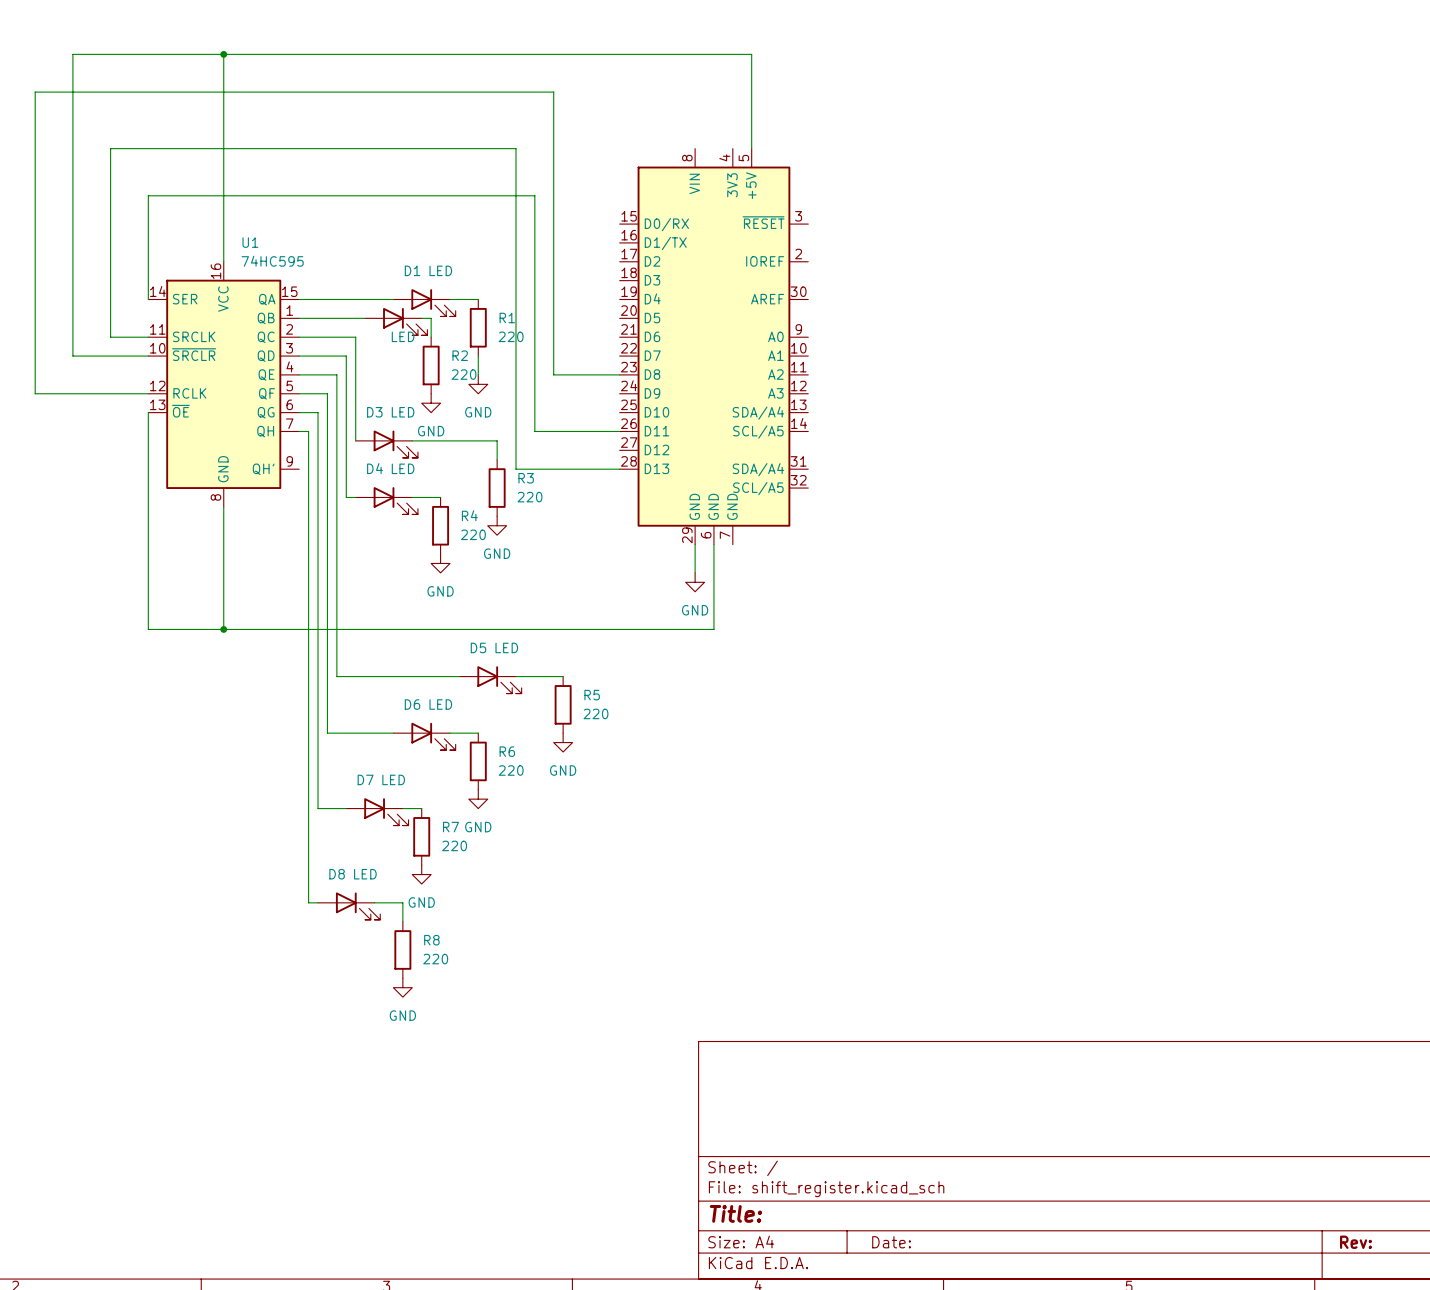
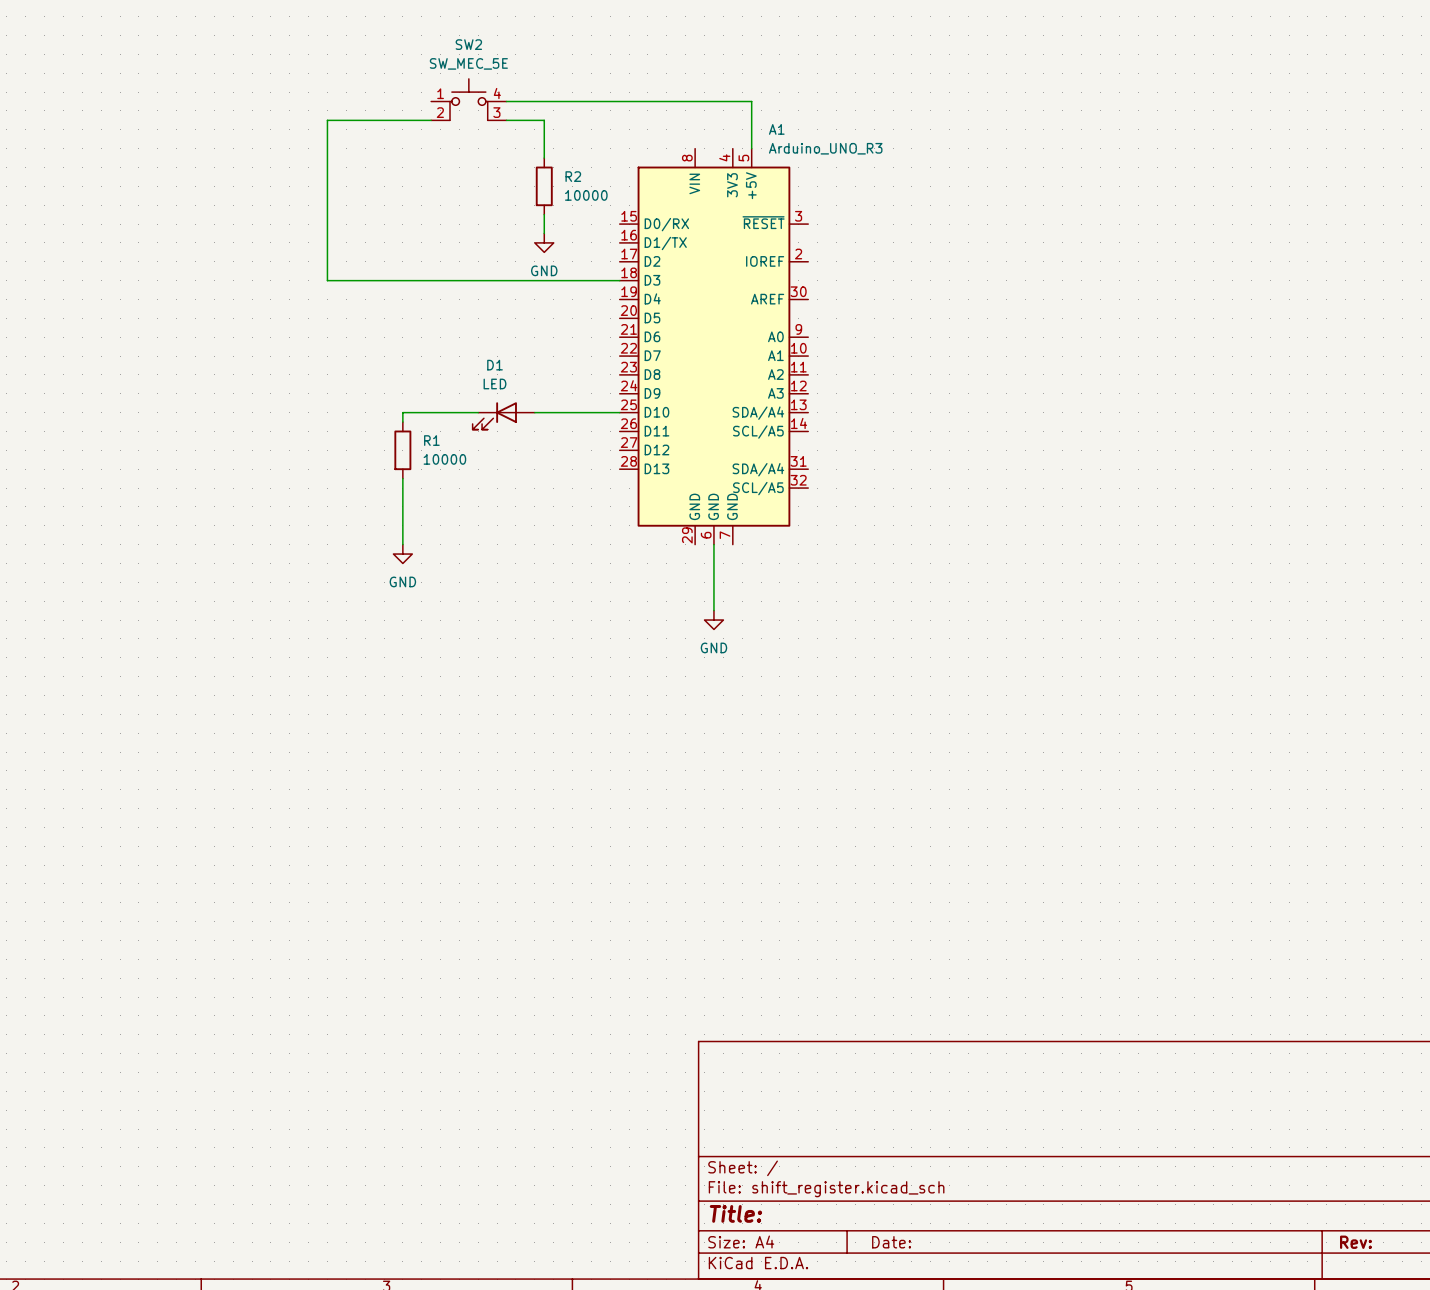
wire: (223, 54) (223, 261) -> none
junction: (223, 54) -> none
SW2: none -> SW_MEC_5E (468, 99)
wire: (751, 101) (751, 54) (72, 54) (72, 356) (148, 356) -> (751, 101) (506, 101)
wire: none -> (431, 120) (327, 120) (327, 280) (619, 280)
wire: none -> (506, 120) (544, 120) (544, 158)
A1 name: none -> A1 (776, 129)
A1 value: none -> Arduino_UNO_R3 (825, 148)
power symbol: none -> GND (544, 242)
D1 name position: D1 (412, 270) -> D1 (495, 365)
wire: (148, 299) (148, 195) (534, 195) (534, 431) (619, 431) -> none
wire: (299, 299) (393, 299) -> none
wire: (450, 299) (478, 299) -> none
D1 position: (424, 302) -> (503, 415)
D1 flip: as is (433, 302) -> left-right (494, 415)
wire: (299, 318) (365, 318) -> none
wire: (421, 318) (431, 318) (431, 337) -> none
part: LED (396, 321) -> none
R1 position: (478, 327) -> (402, 450)
R1 value: 220 (511, 336) -> 10000 (444, 459)
wire: (148, 337) (110, 337) (110, 148) (515, 148) (515, 469) (619, 469) -> none
wire: (299, 337) (355, 337) (355, 440) -> none
wire: (299, 356) (346, 356) (346, 497) (355, 497) -> none
wire: (478, 356) (478, 374) -> (544, 214) (544, 233)
R2 position: (431, 365) -> (544, 186)
wire: (299, 374) (336, 374) (336, 676) (459, 676) -> none
R2 value: 220 (463, 374) -> 10000 (586, 195)
wire: (619, 374) (553, 374) (553, 92) (35, 92) (35, 393) (148, 393) -> none
U1: 74HC595 (223, 384) -> none
power symbol: GND (478, 384) -> none
wire: (299, 393) (327, 393) (327, 733) (393, 733) -> none
power symbol: GND (431, 403) -> none
wire: (148, 412) (148, 629) (713, 629) (713, 610) -> none
wire: (299, 412) (318, 412) (318, 808) (346, 808) -> none
wire: none -> (478, 412) (402, 412) (402, 422)
wire: none -> (534, 412) (619, 412)
wire: (299, 431) (308, 431) (308, 902) (318, 902) -> none
wire: (412, 440) (497, 440) (497, 459) -> none
D3: LED (386, 444) -> none
wire: none -> (402, 478) (402, 544)
R3: 220 (497, 488) -> none
wire: (412, 497) (440, 497) -> none
D4: LED (386, 500) -> none
wire: (223, 506) (223, 629) -> none
R4: 220 (440, 525) -> none
power symbol: GND (497, 525) -> none
wire: (695, 544) (695, 572) -> none
power symbol position: GND (440, 563) -> GND (402, 554)
power symbol position: GND (695, 582) -> GND (713, 620)
junction: (223, 629) -> none
wire: (515, 676) (563, 676) -> none
D5: LED (490, 679) -> none
R5: 220 (563, 704) -> none
wire: (450, 733) (478, 733) -> none
D6: LED (424, 736) -> none
power symbol: GND (563, 742) -> none
R6: 220 (478, 761) -> none
power symbol: GND (478, 799) -> none
wire: (402, 808) (421, 808) -> none
D7: LED (377, 811) -> none
R7: 220 (421, 836) -> none
power symbol: GND (421, 874) -> none
wire: (374, 902) (402, 902) (402, 921) -> none
D8: LED (349, 906) -> none
R8: 220 (402, 949) -> none
power symbol: GND (402, 987) -> none

